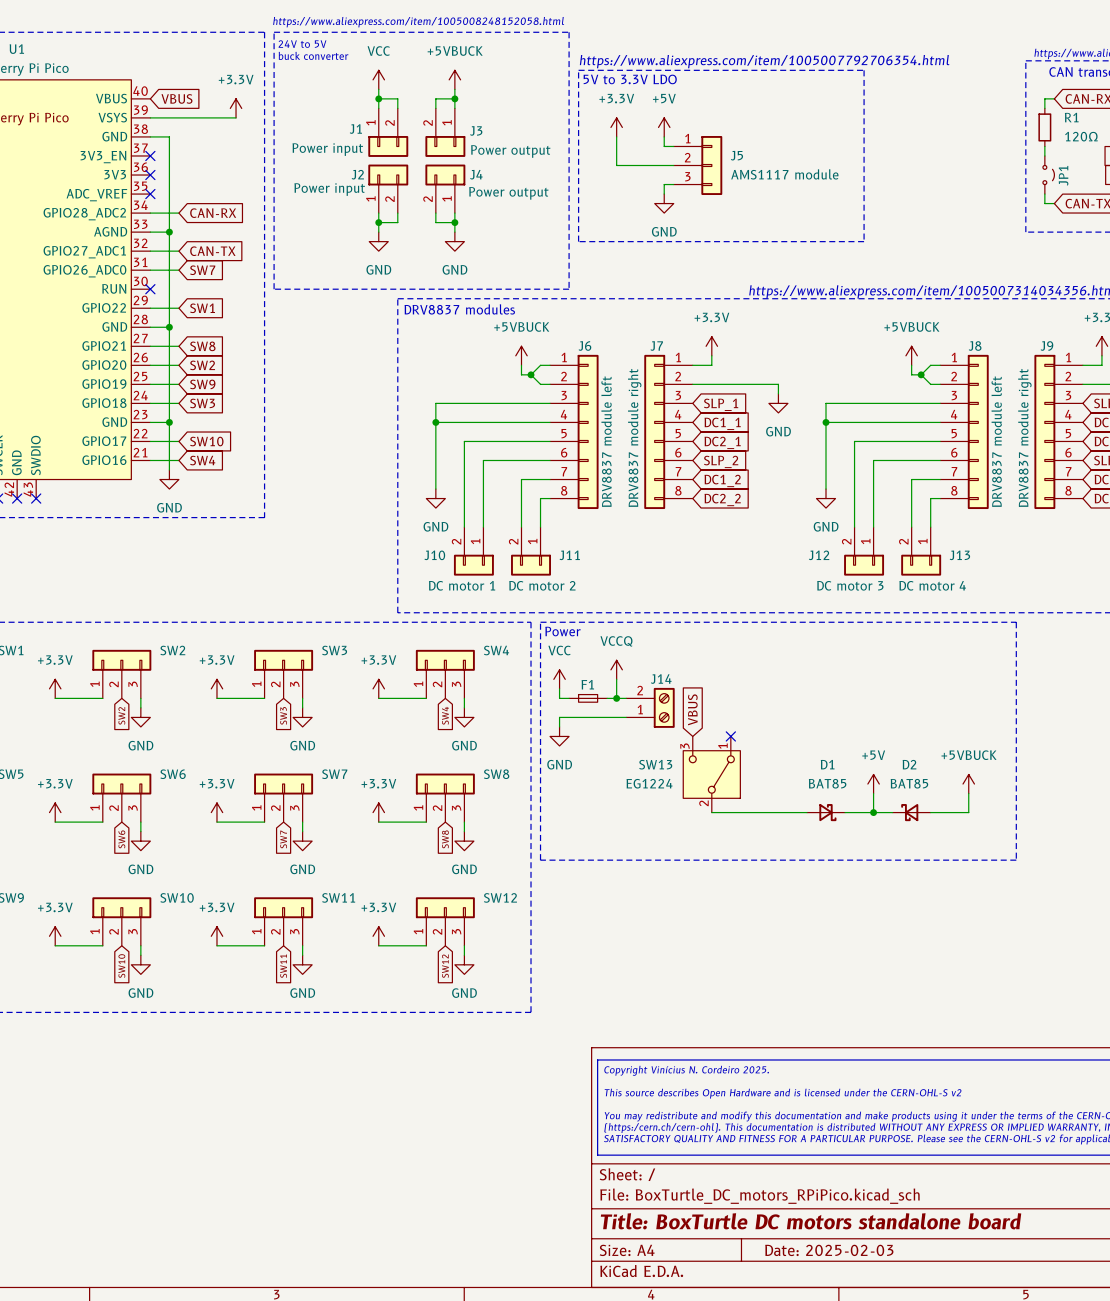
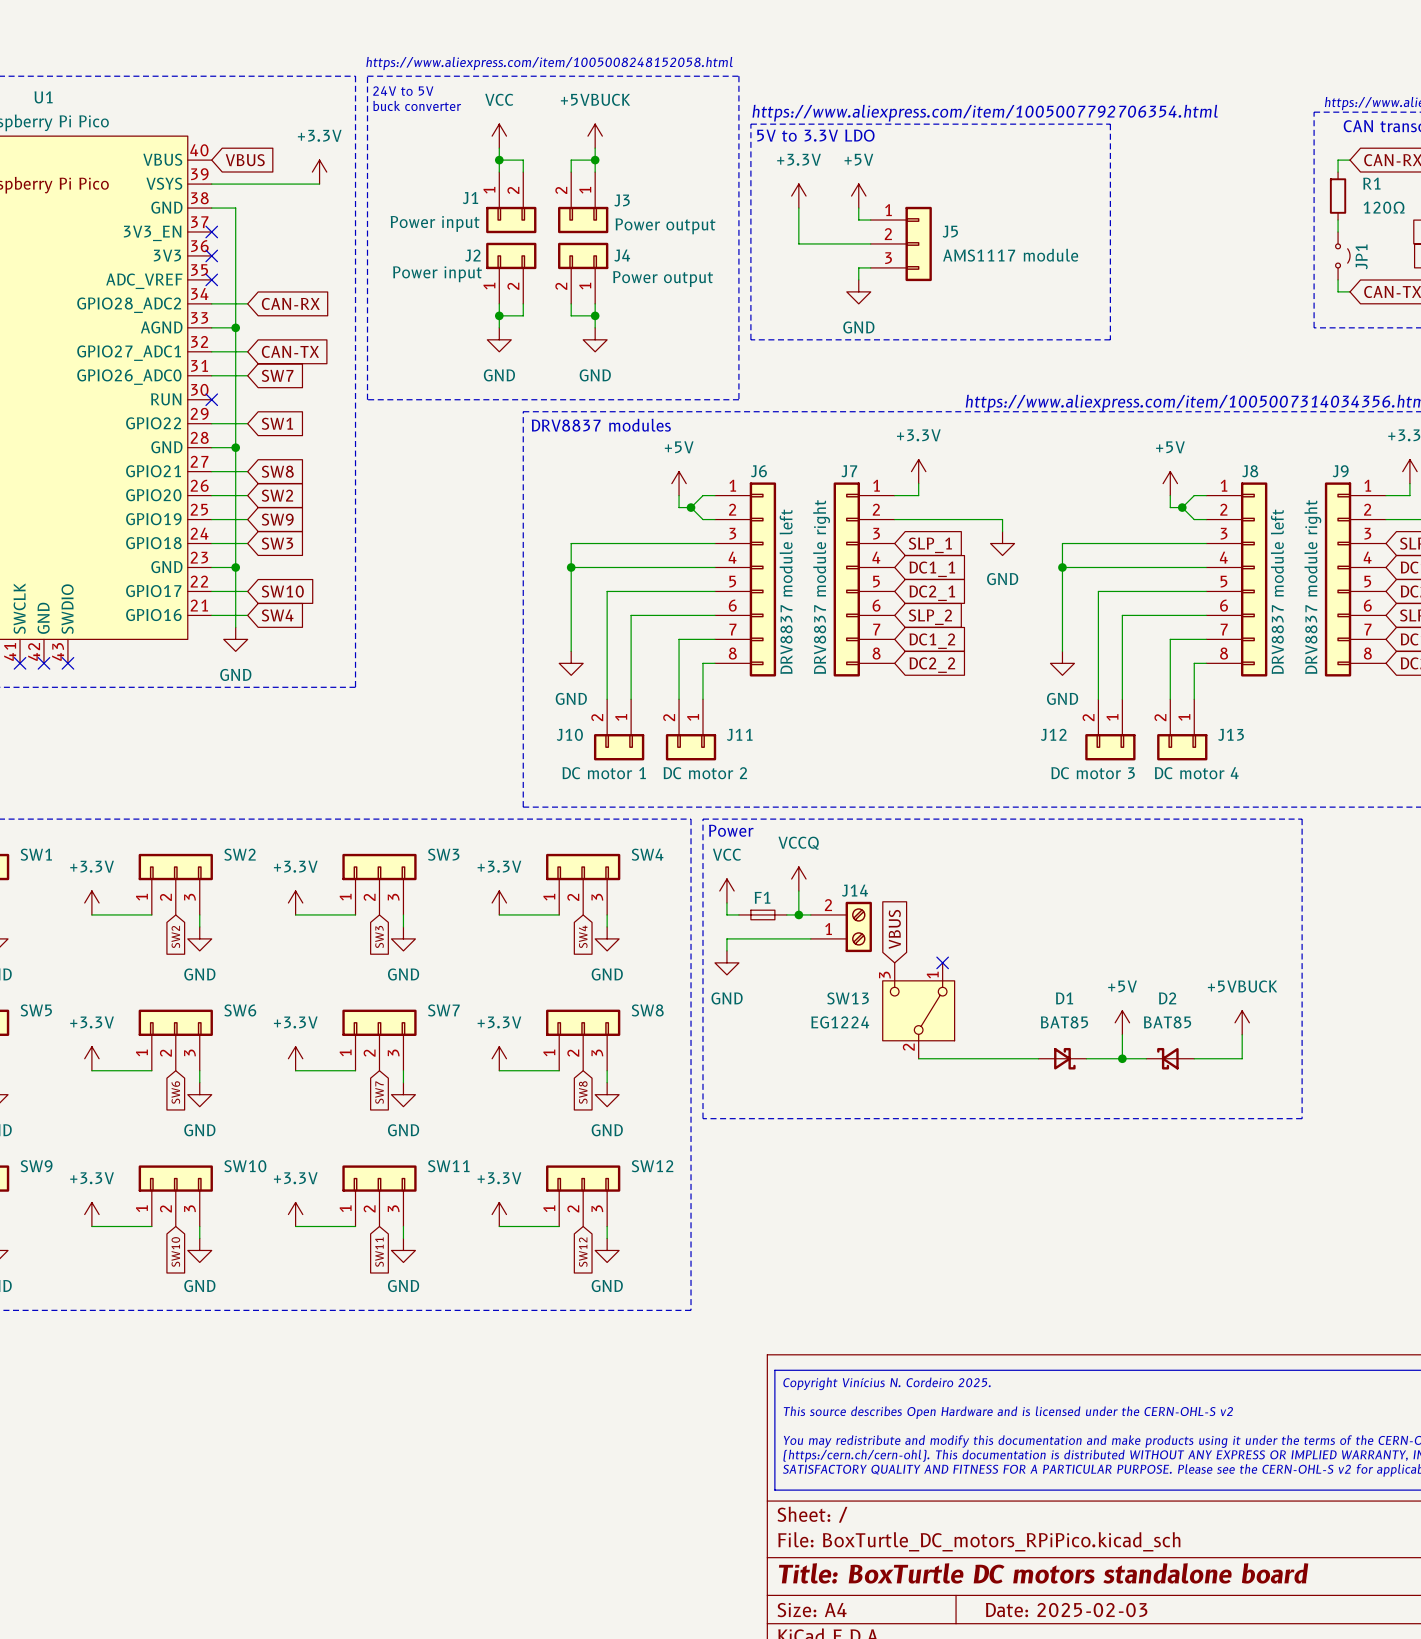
power symbol: +5VBUCK (521, 355) -> +5V (679, 483)
power symbol: +5VBUCK (911, 355) -> +5V (1170, 483)

